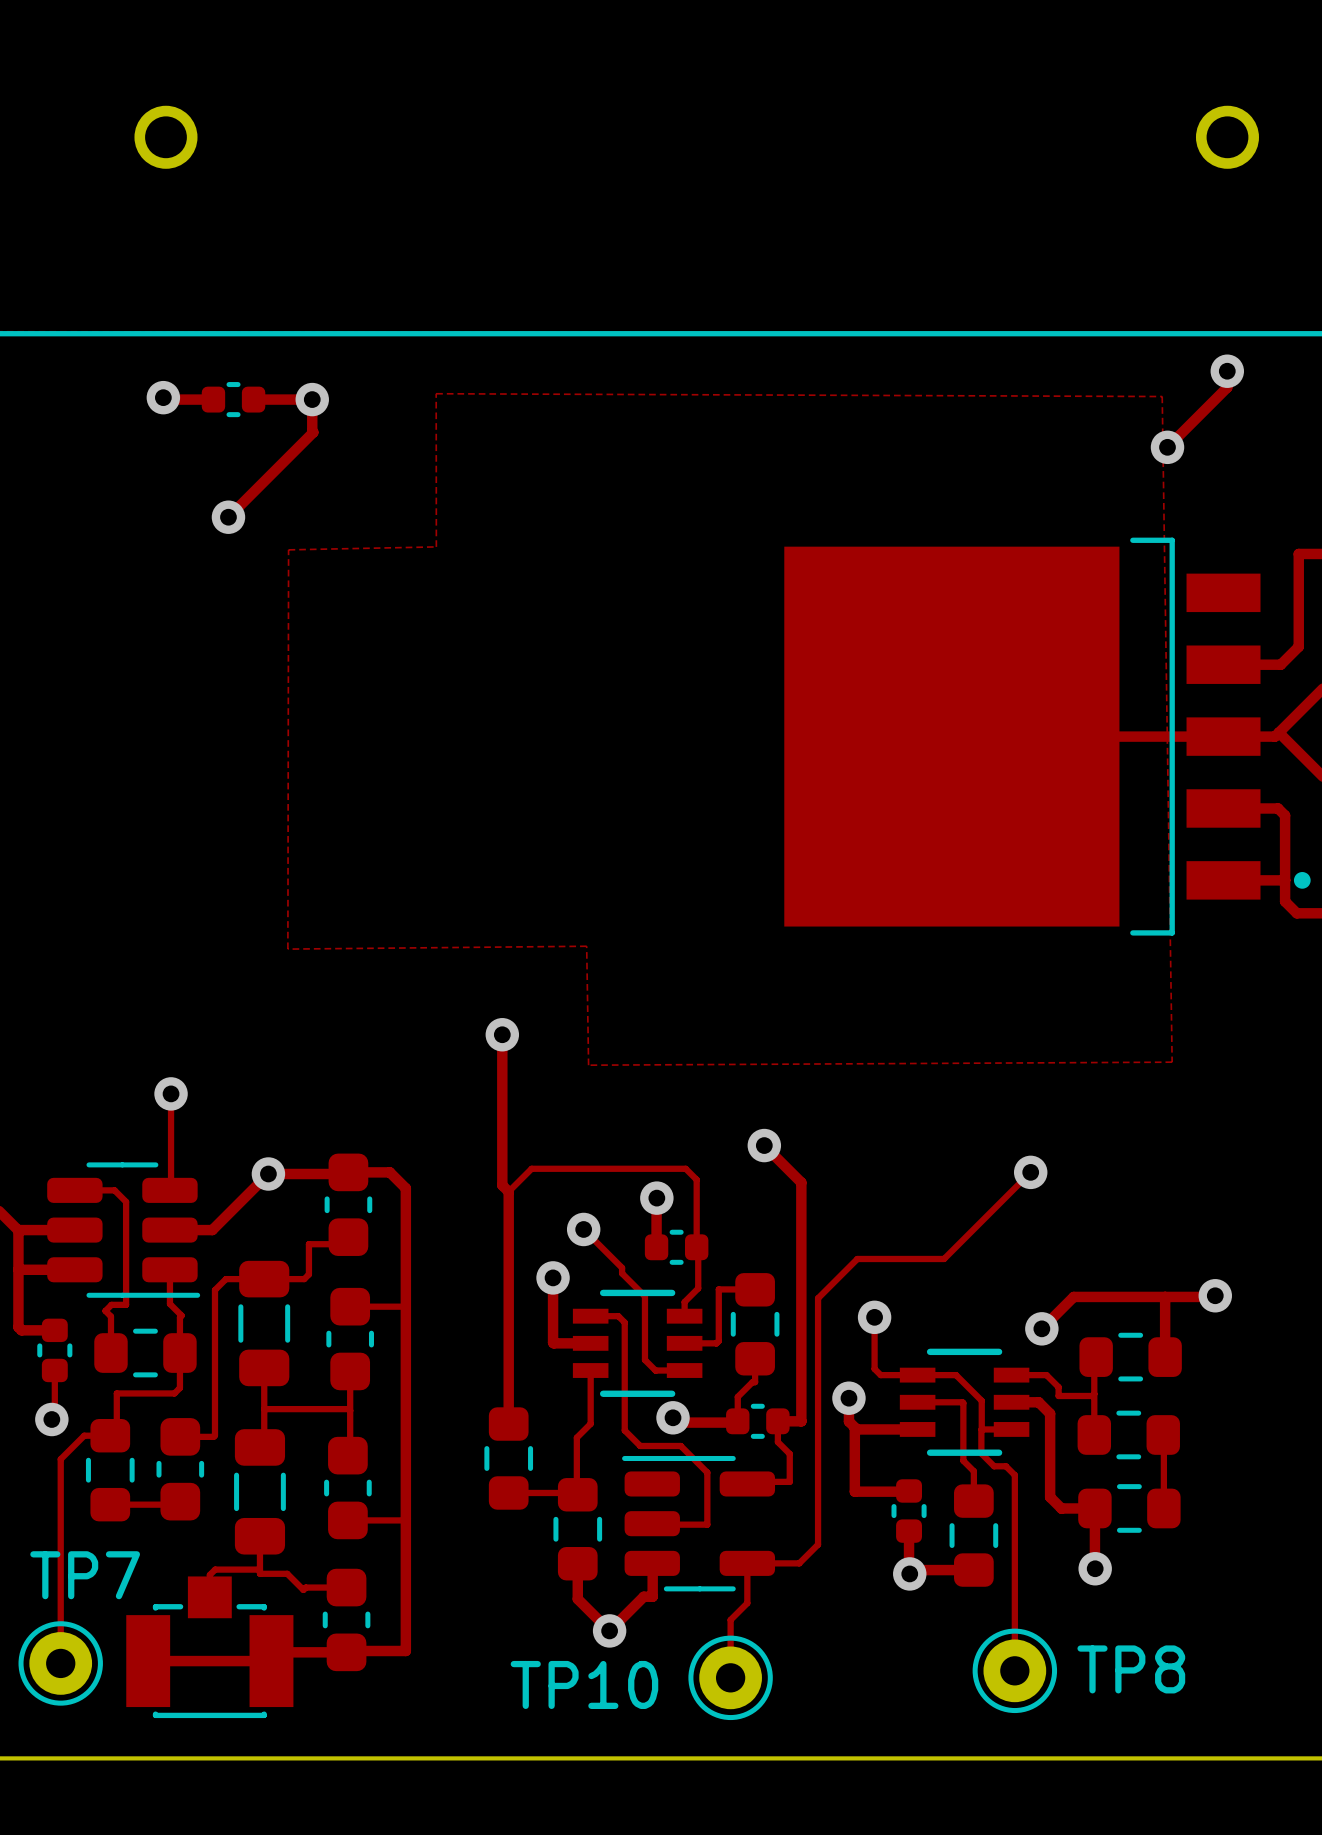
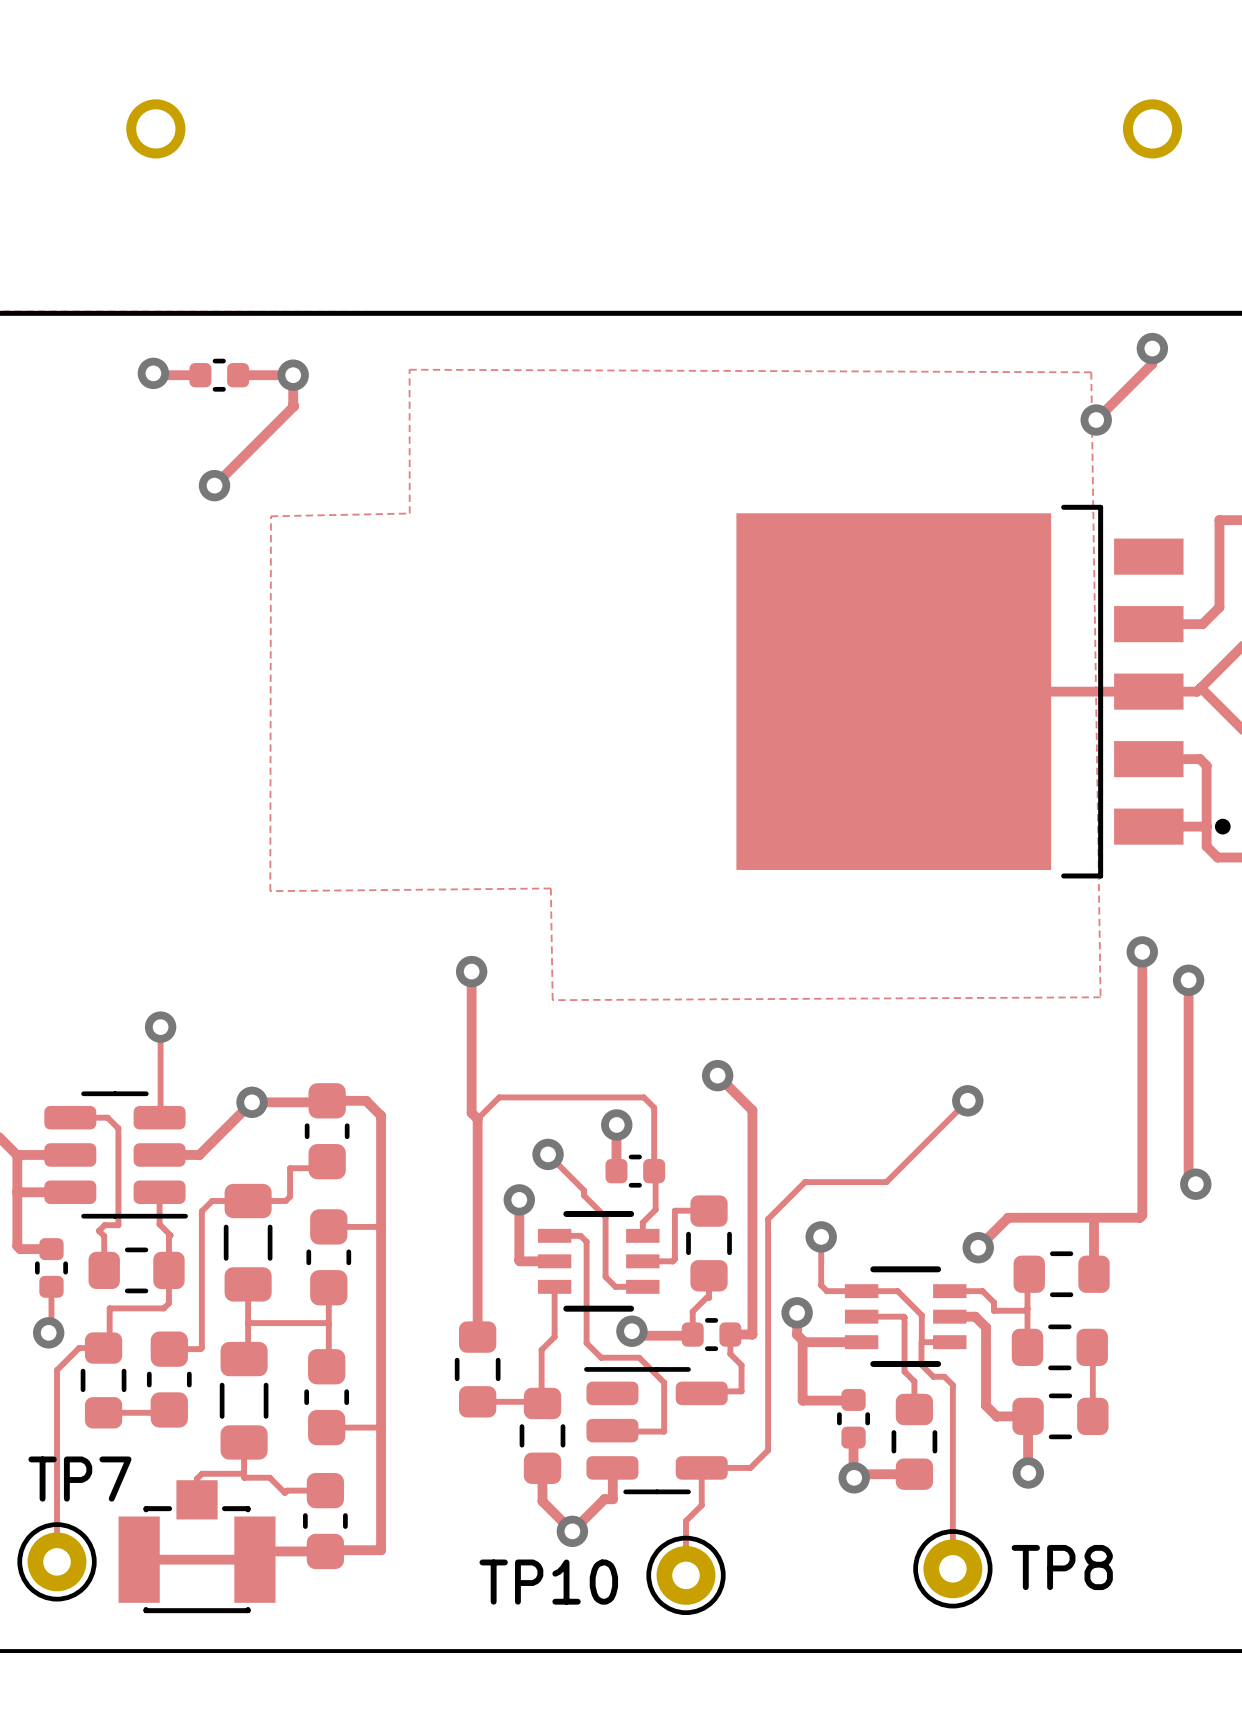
track: none -> (1142, 951) (1141, 1216)
via: none -> (1142, 951)
track: none -> (1188, 980) (1188, 1177) (1195, 1184)
via: none -> (1188, 980)
via position: (1215, 1295) -> (1195, 1184)

